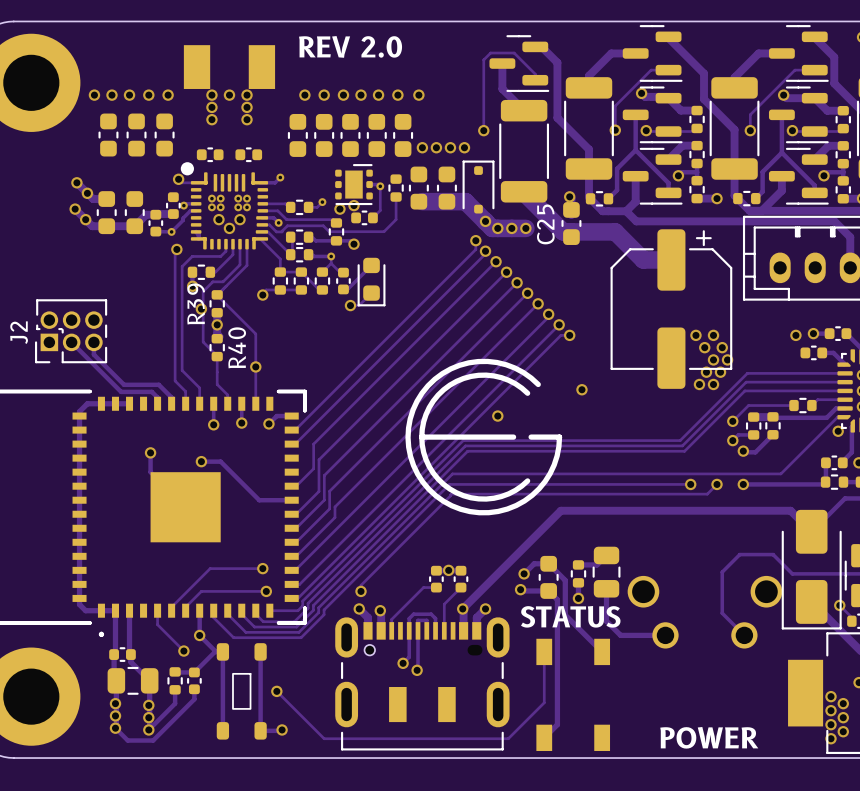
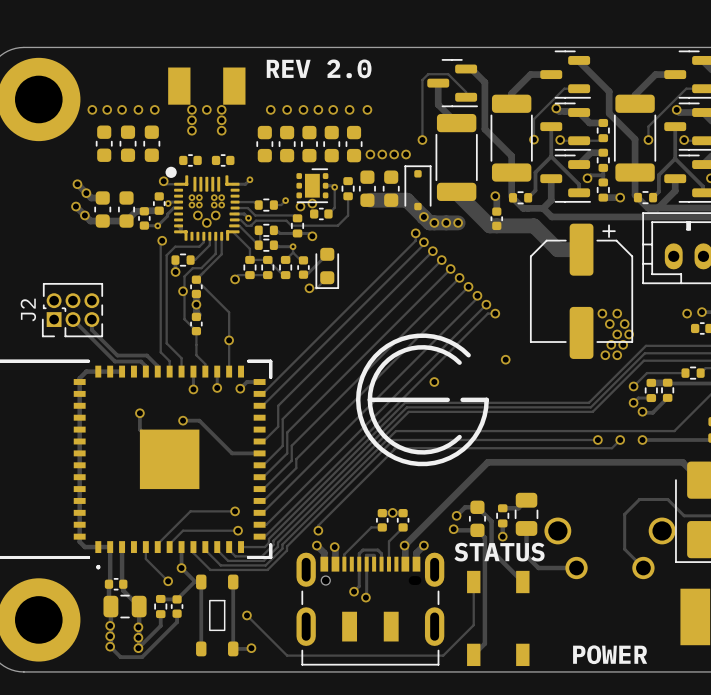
C25: (571, 223) -> none
part: none -> (496, 218)
R39: (217, 303) -> none
part: none -> (196, 286)
R40: (217, 347) -> none
part: none -> (196, 324)

